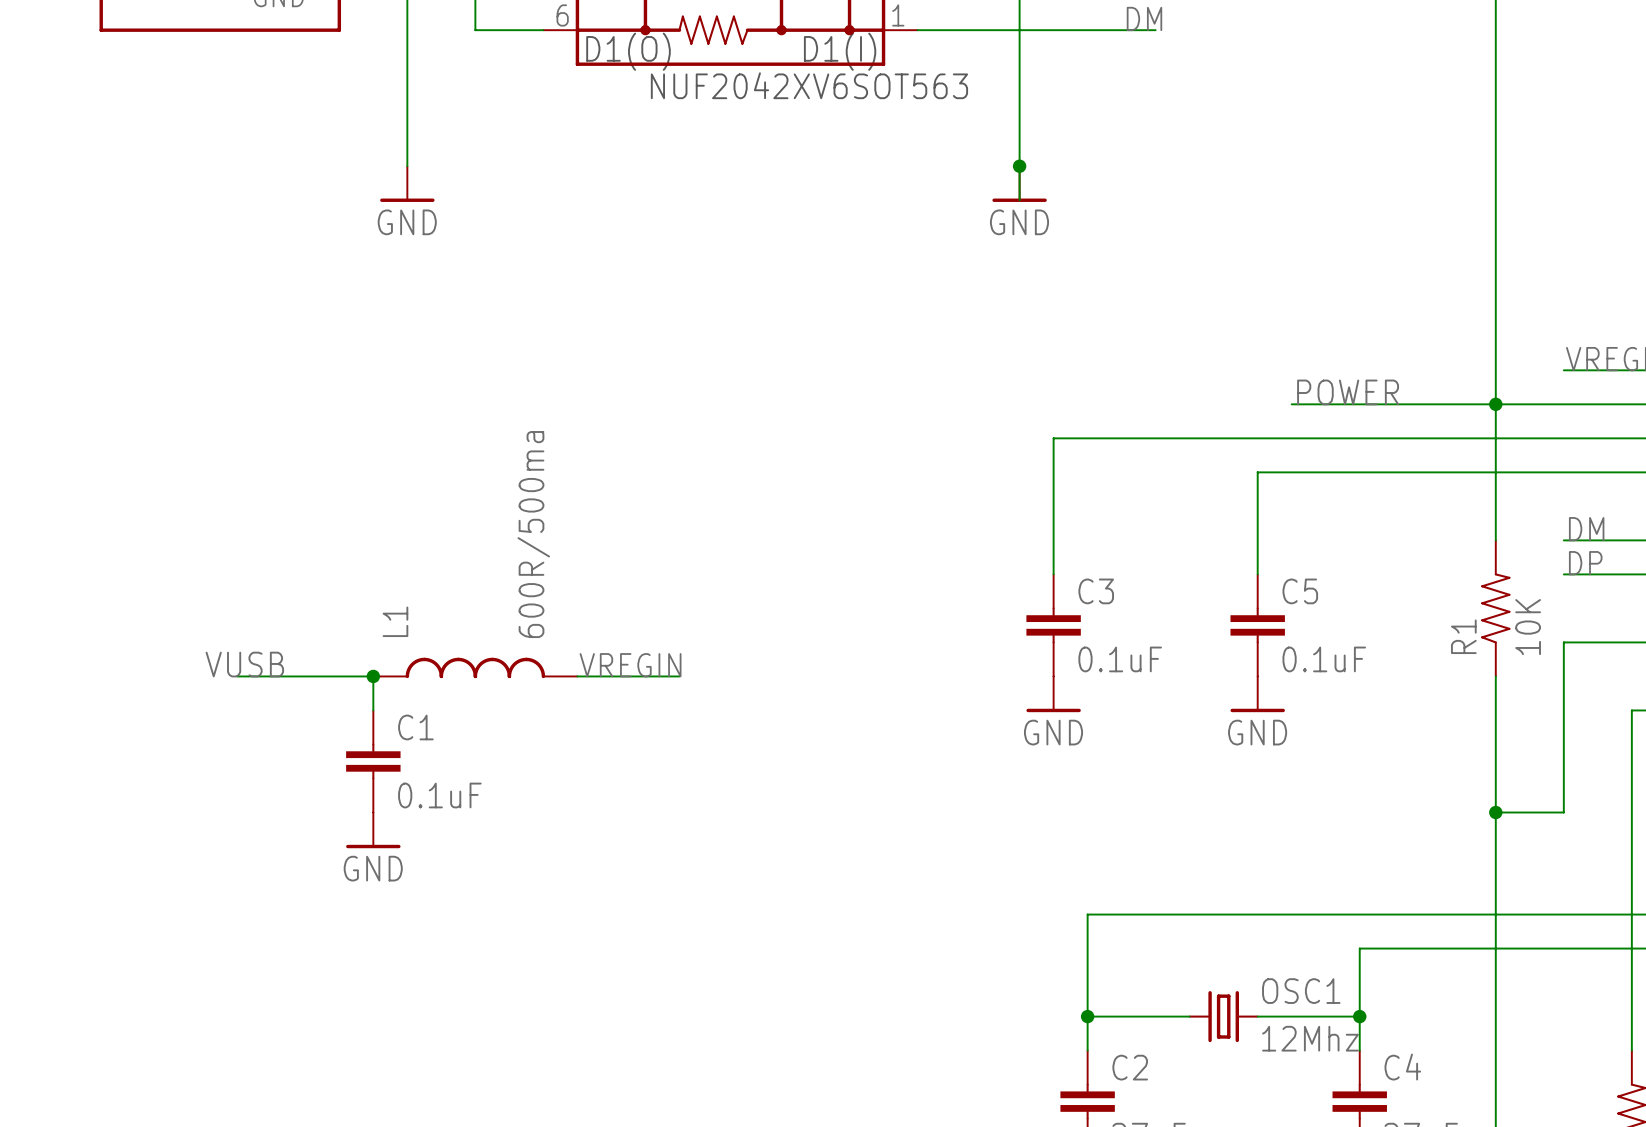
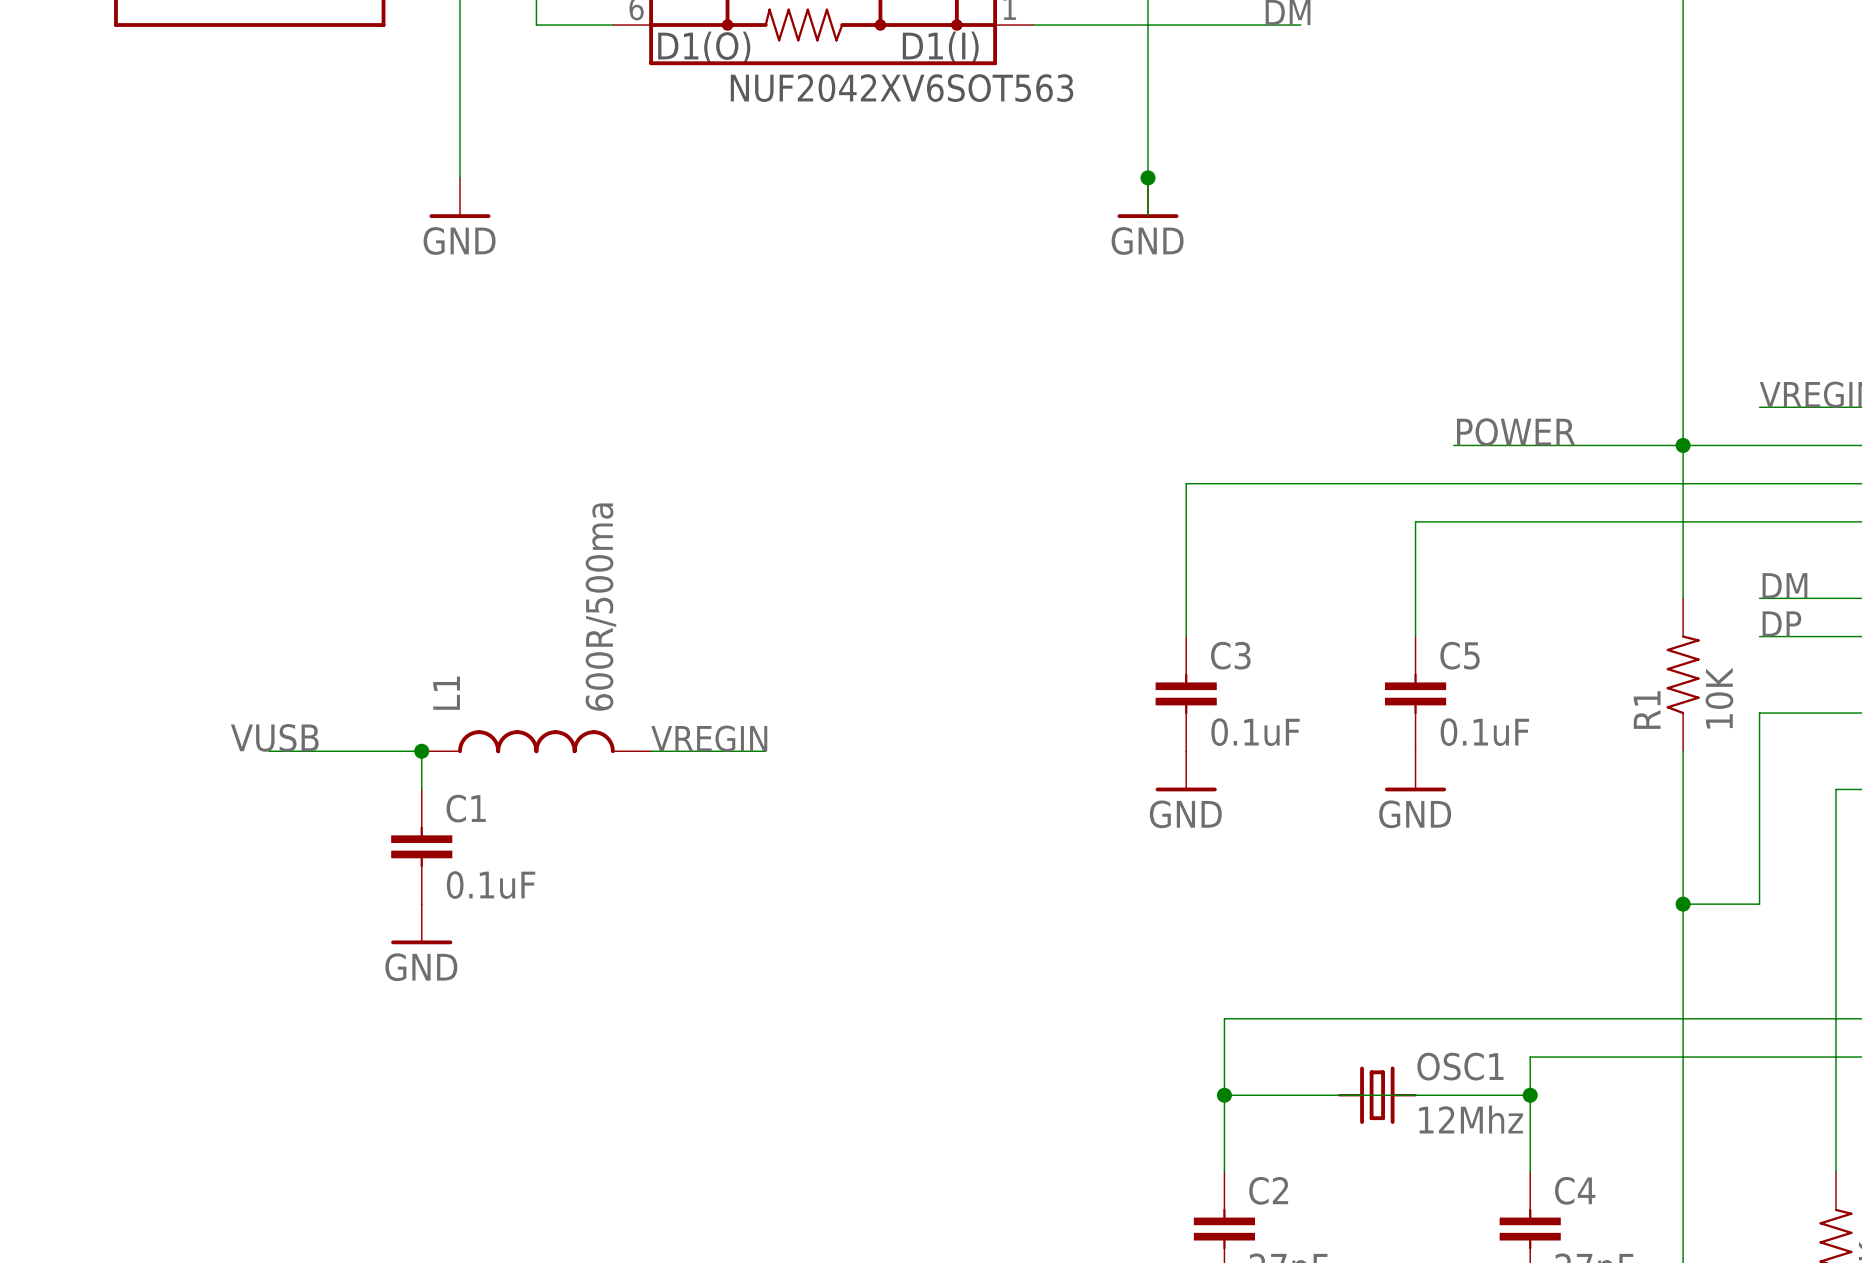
wire: none -> (1224, 1095) (1530, 1095)
wire: (1087, 1016) (1189, 1016) -> none
junction position: (1087, 1016) -> (1224, 1095)
OSC1 position: (1223, 1016) -> (1377, 1095)
wire: (1257, 1016) (1359, 1016) -> none
junction position: (1359, 1016) -> (1530, 1095)

